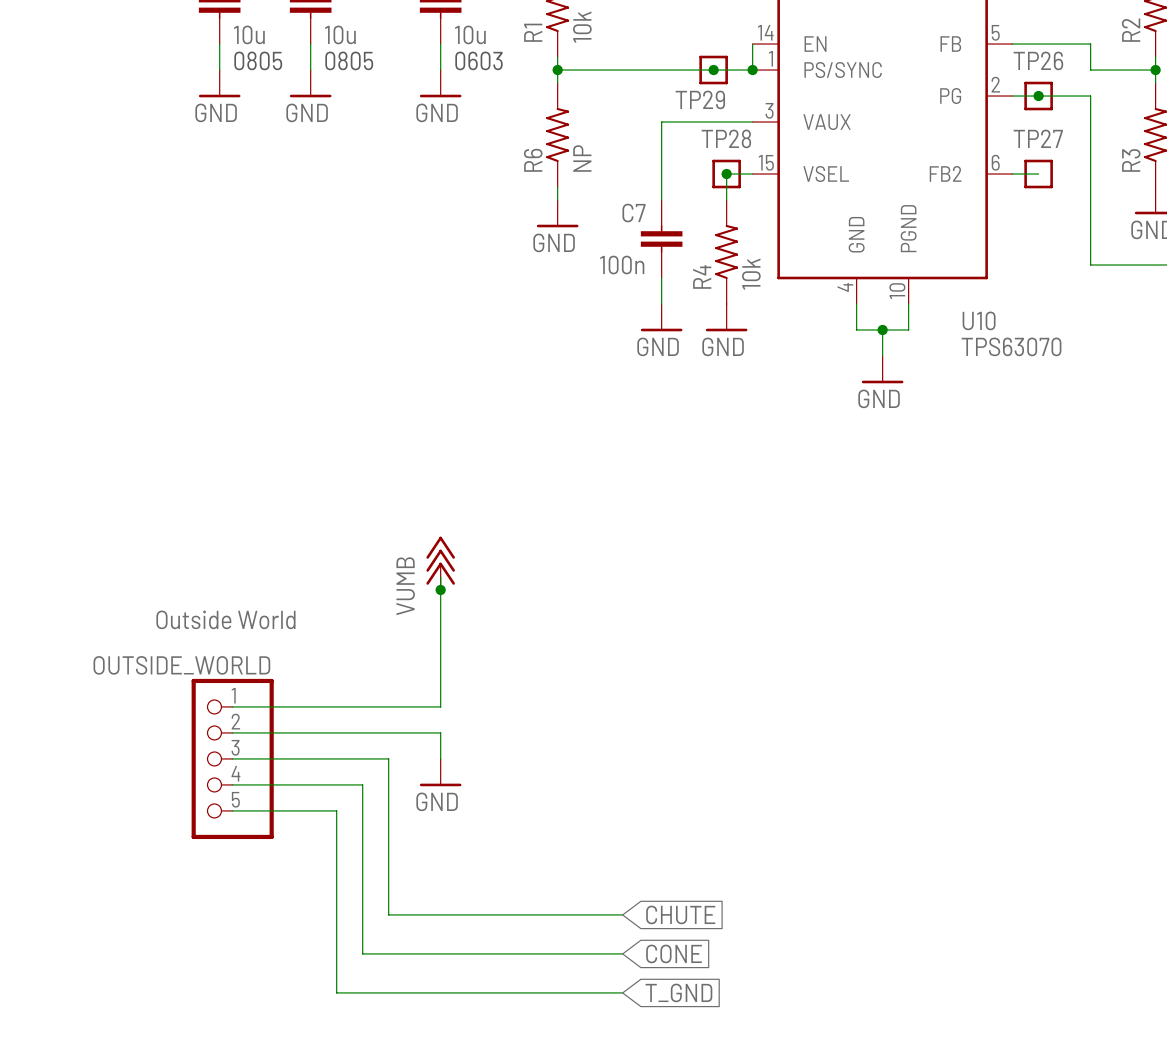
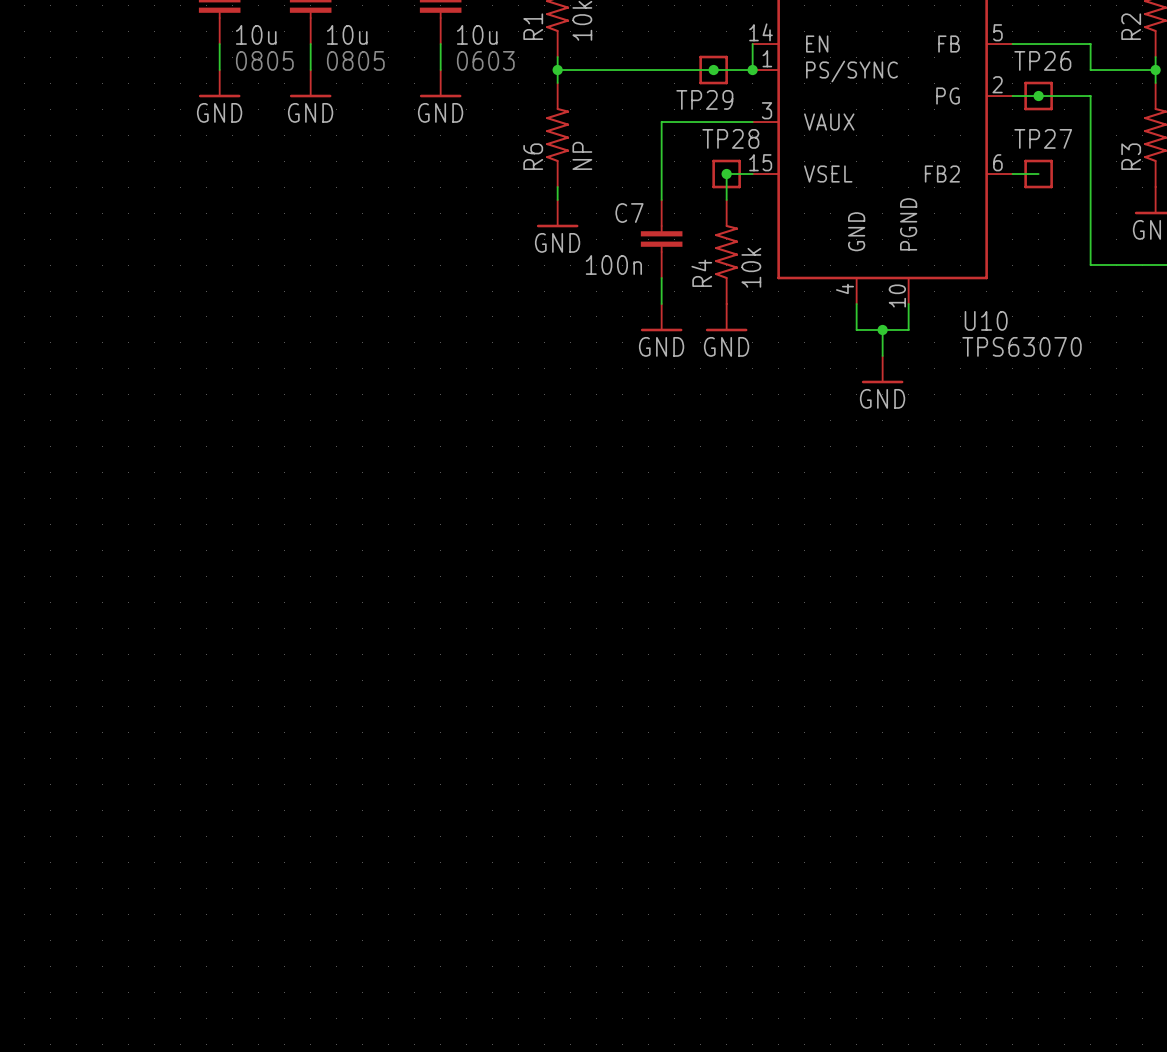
power symbol: VUMB (440, 563) -> none
wire: (440, 576) (440, 706) (232, 706) -> none
junction: (440, 589) -> none
text: Outside World (225, 619) -> none
wire: (232, 732) (440, 732) (440, 758) -> none
wire: (232, 758) (388, 758) (388, 914) (622, 914) -> none
OUTSIDE_WORLD: (232, 758) -> none
power symbol: GND (440, 772) -> none
wire: (232, 784) (362, 784) (362, 953) (622, 953) -> none
wire: (232, 810) (336, 810) (336, 992) (622, 992) -> none
global label: CHUTE (680, 914) -> none
global label: CONE (674, 953) -> none
global label: T_GND (678, 992) -> none

